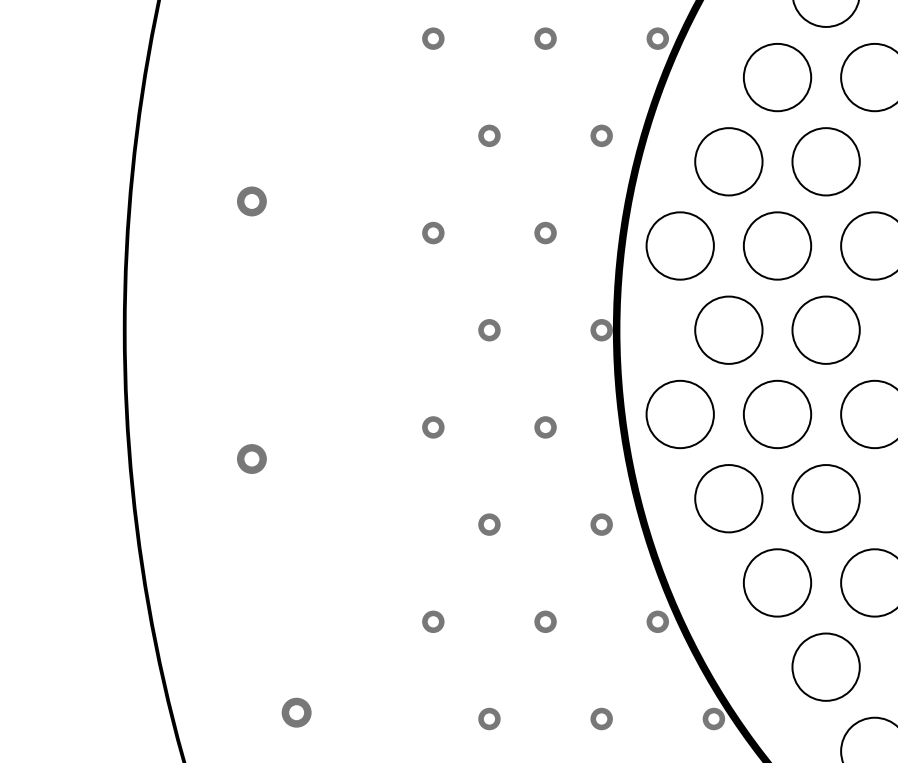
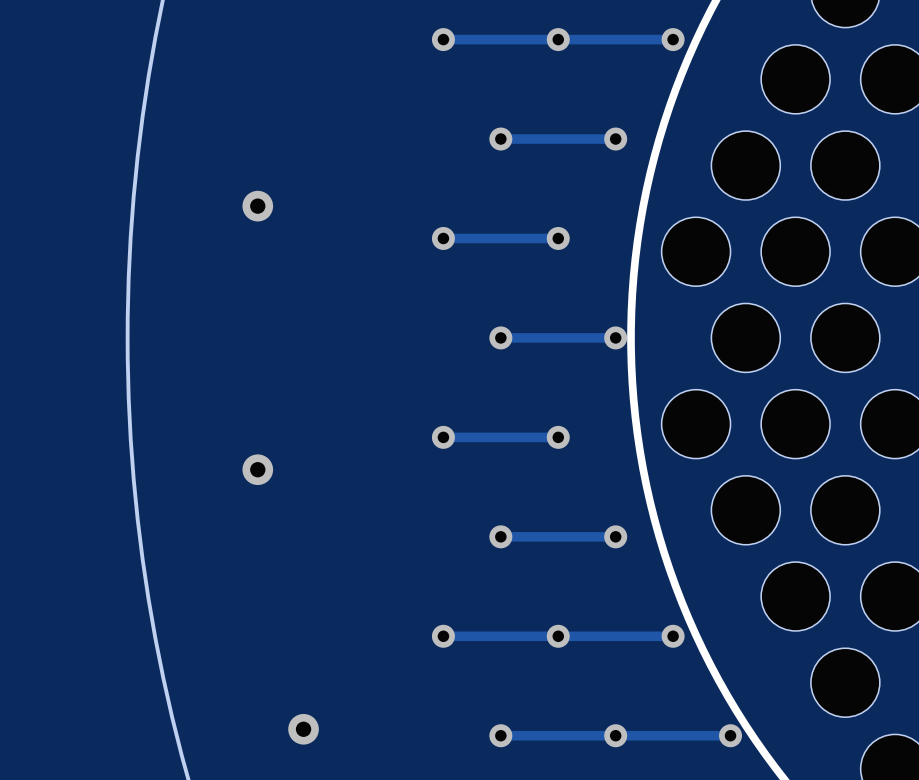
track: none -> (443, 39) (673, 39)
track: none -> (500, 139) (615, 139)
track: none -> (443, 238) (558, 238)
track: none -> (500, 337) (615, 337)
track: none -> (443, 437) (558, 437)
track: none -> (500, 536) (615, 536)
track: none -> (443, 636) (673, 636)
track: none -> (500, 735) (730, 735)

